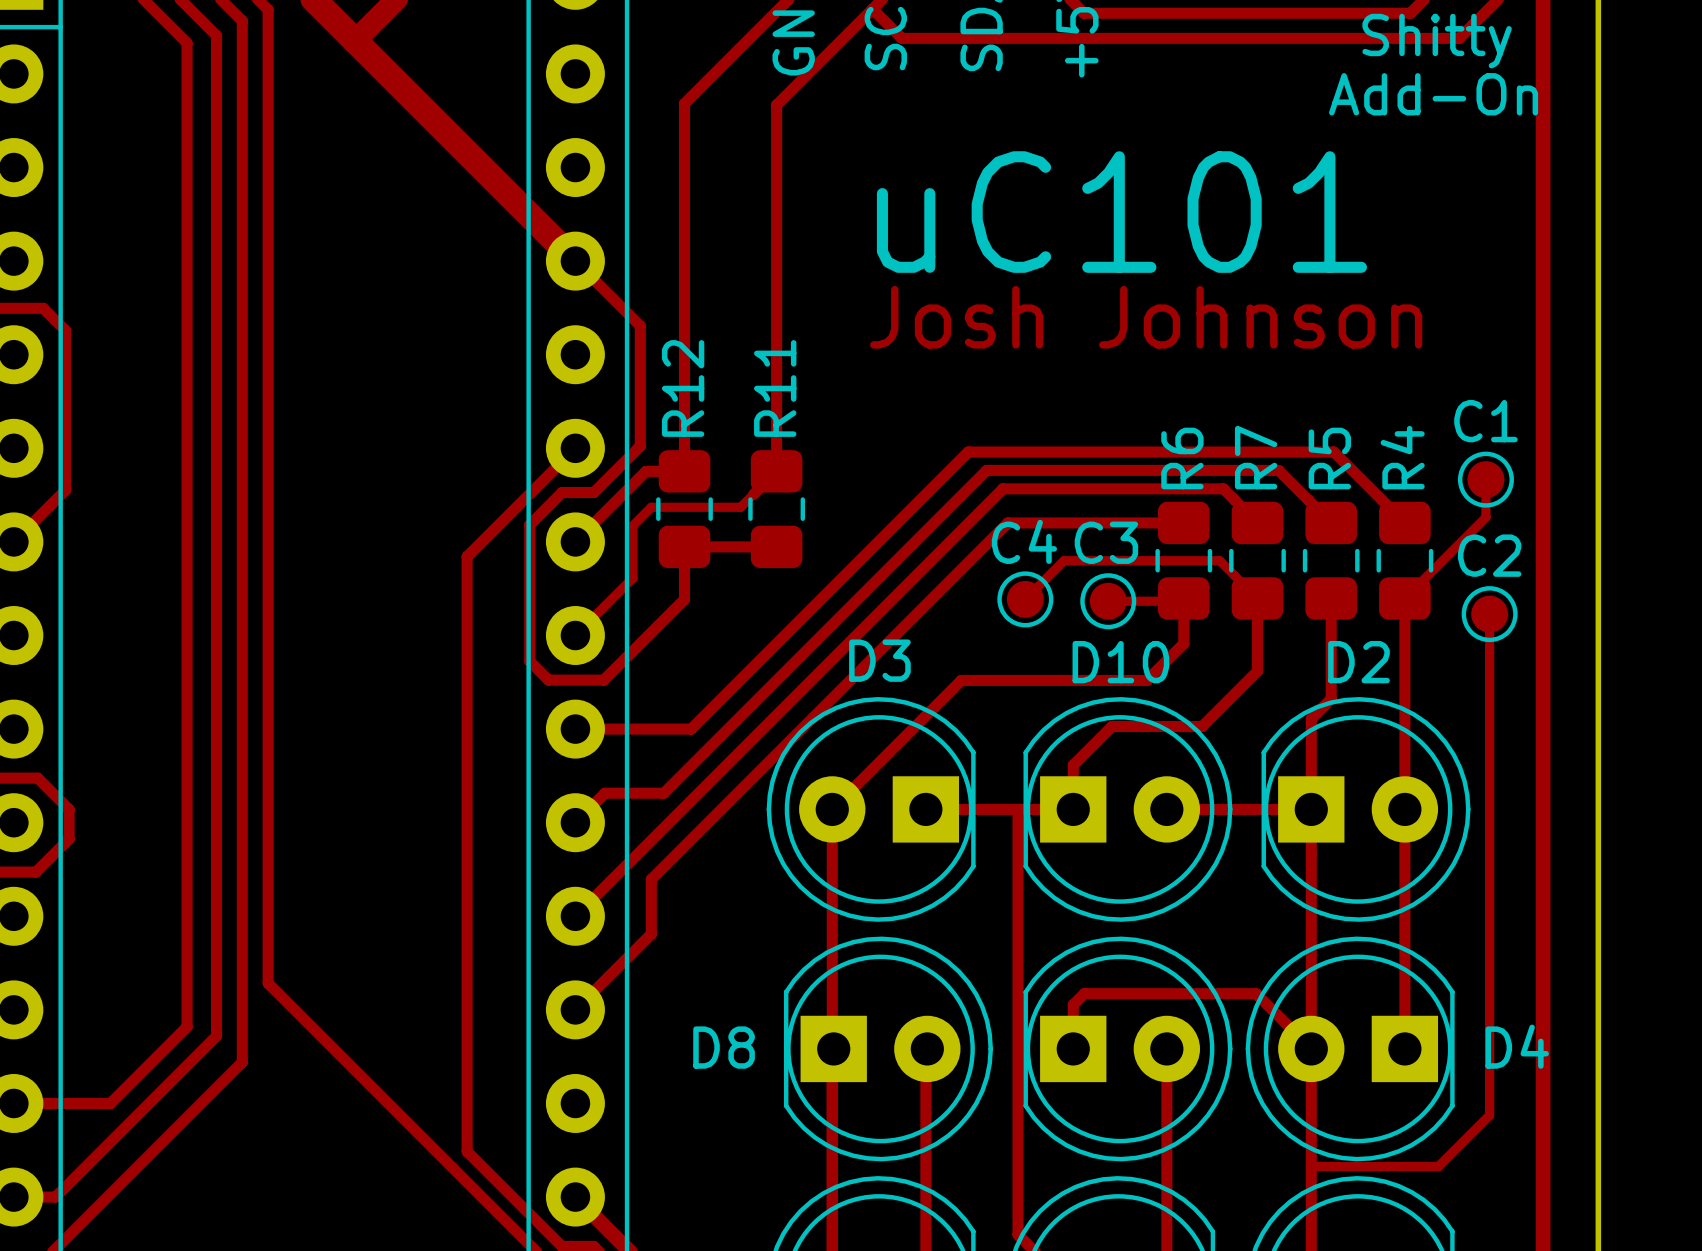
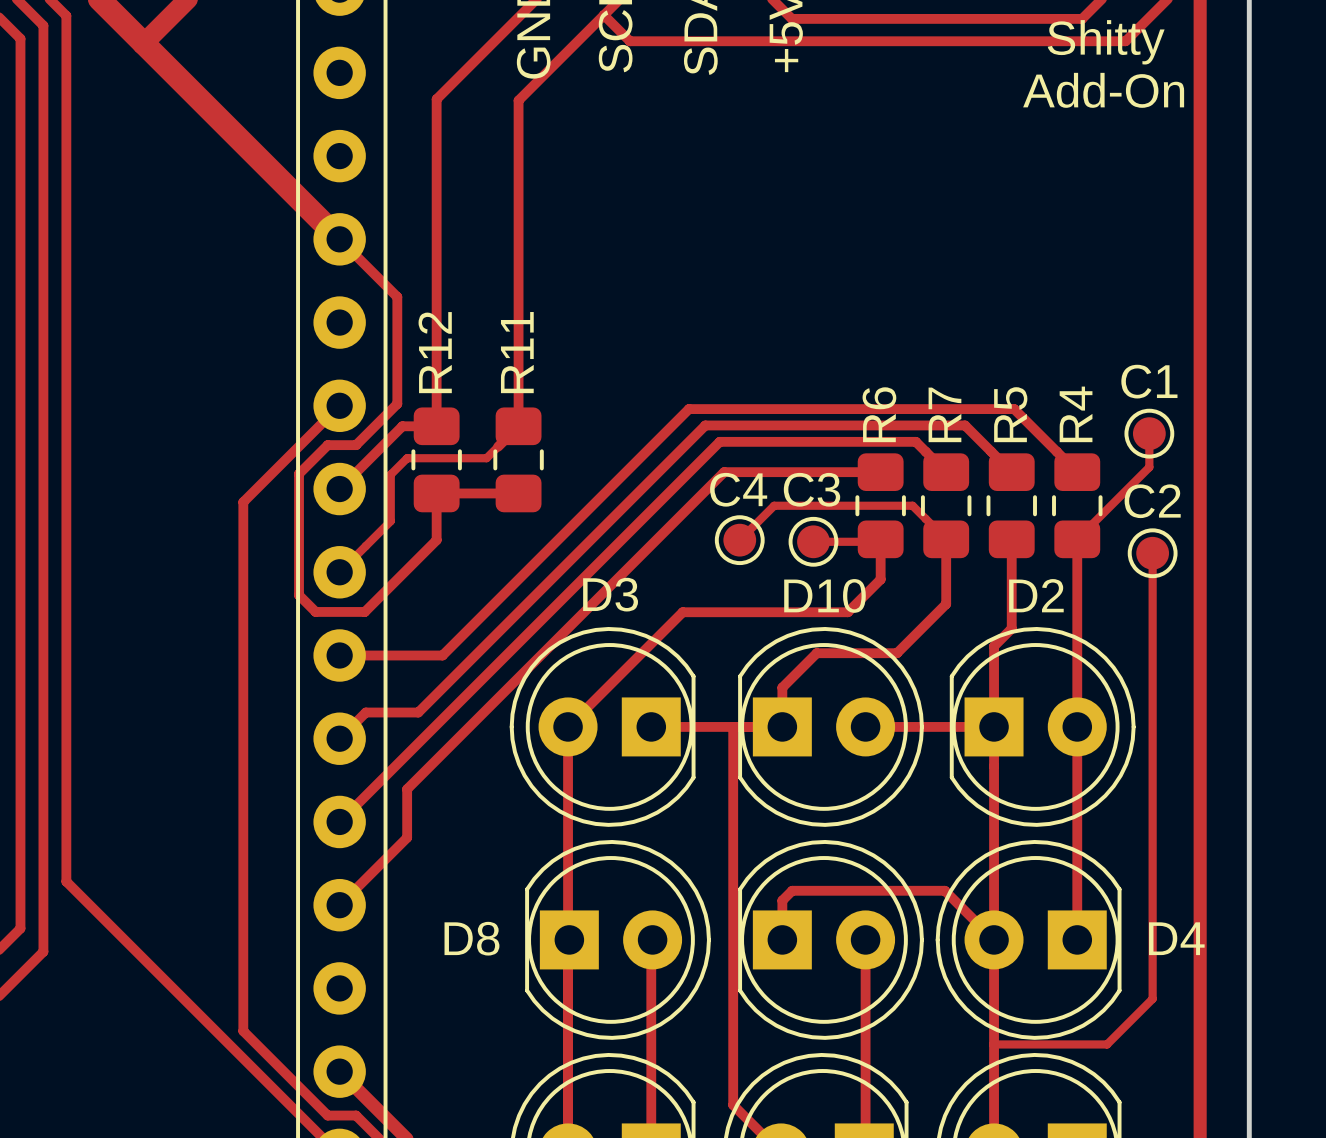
text: uC101 (1121, 212) -> none
text: Josh Johnson (1146, 317) -> none

